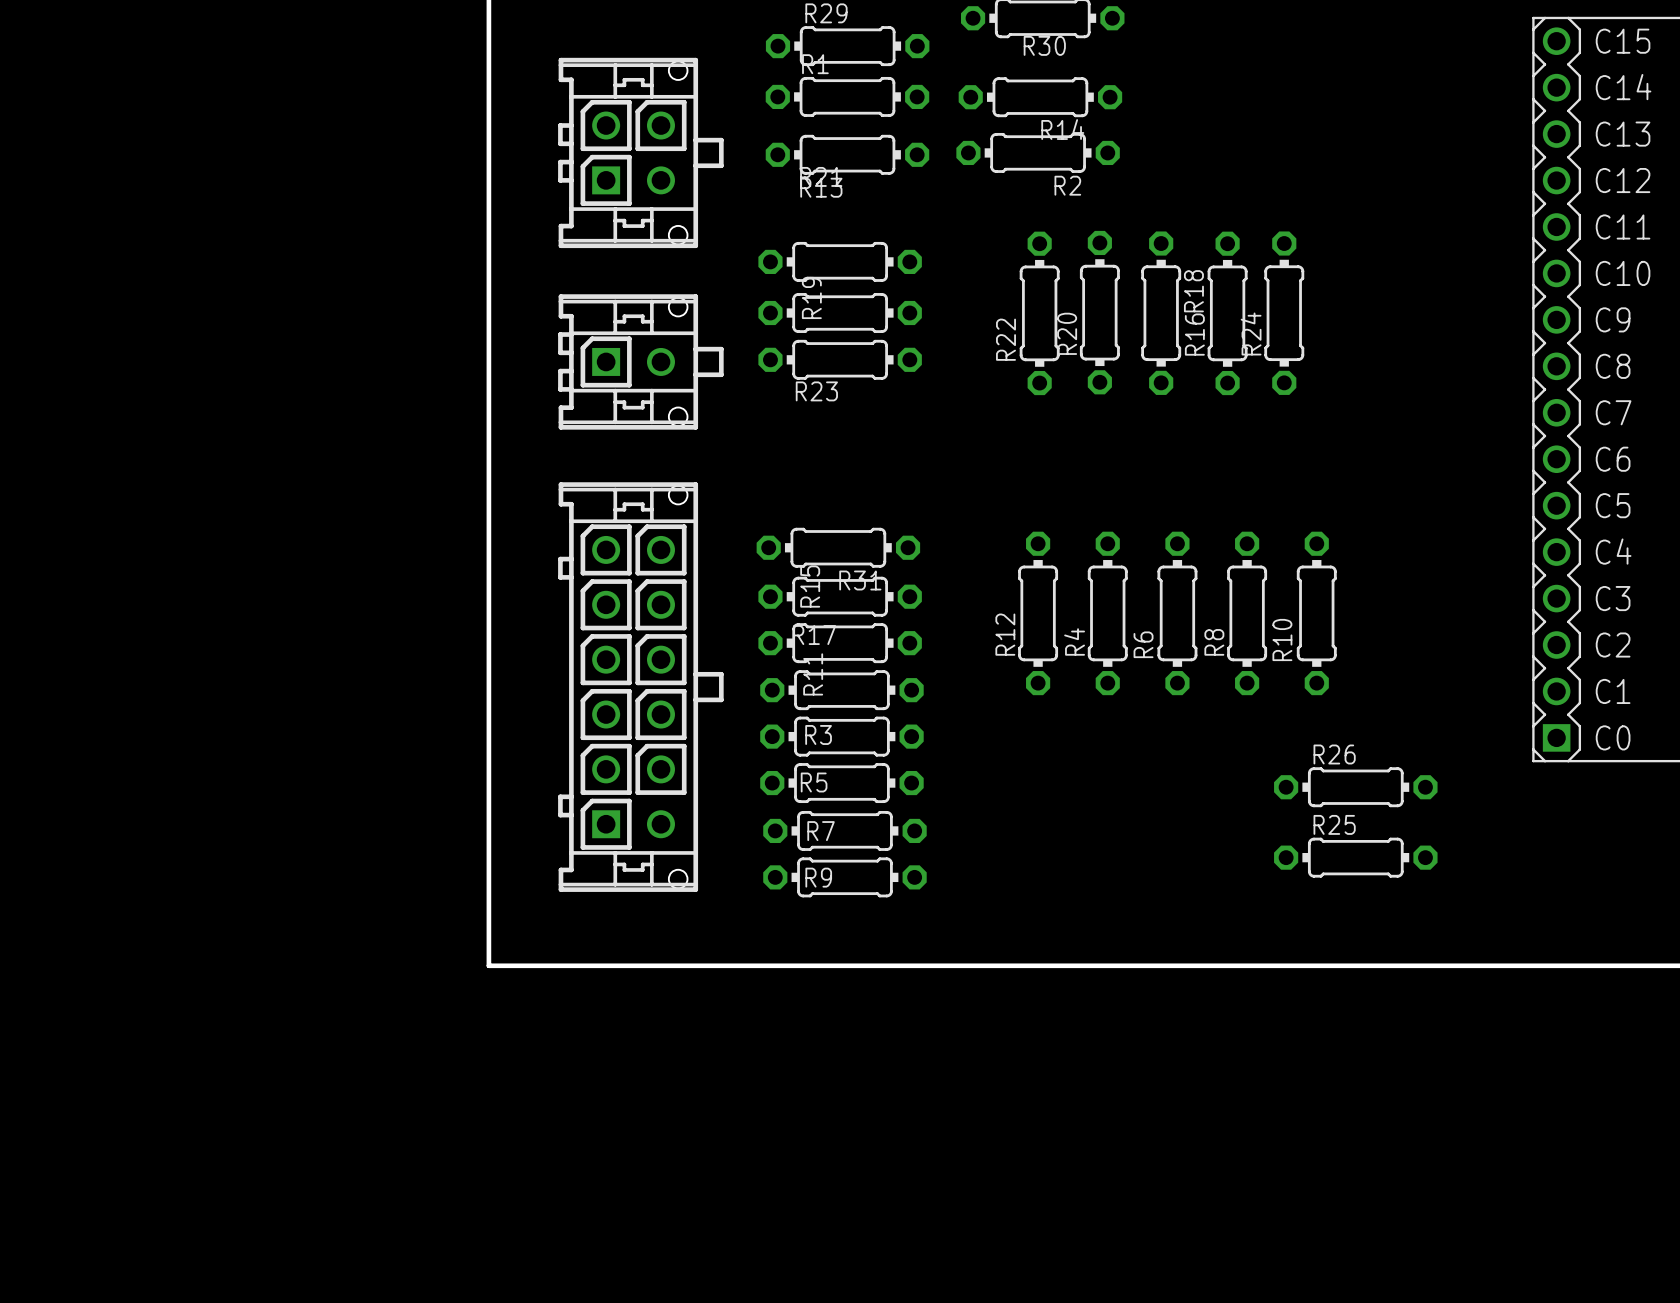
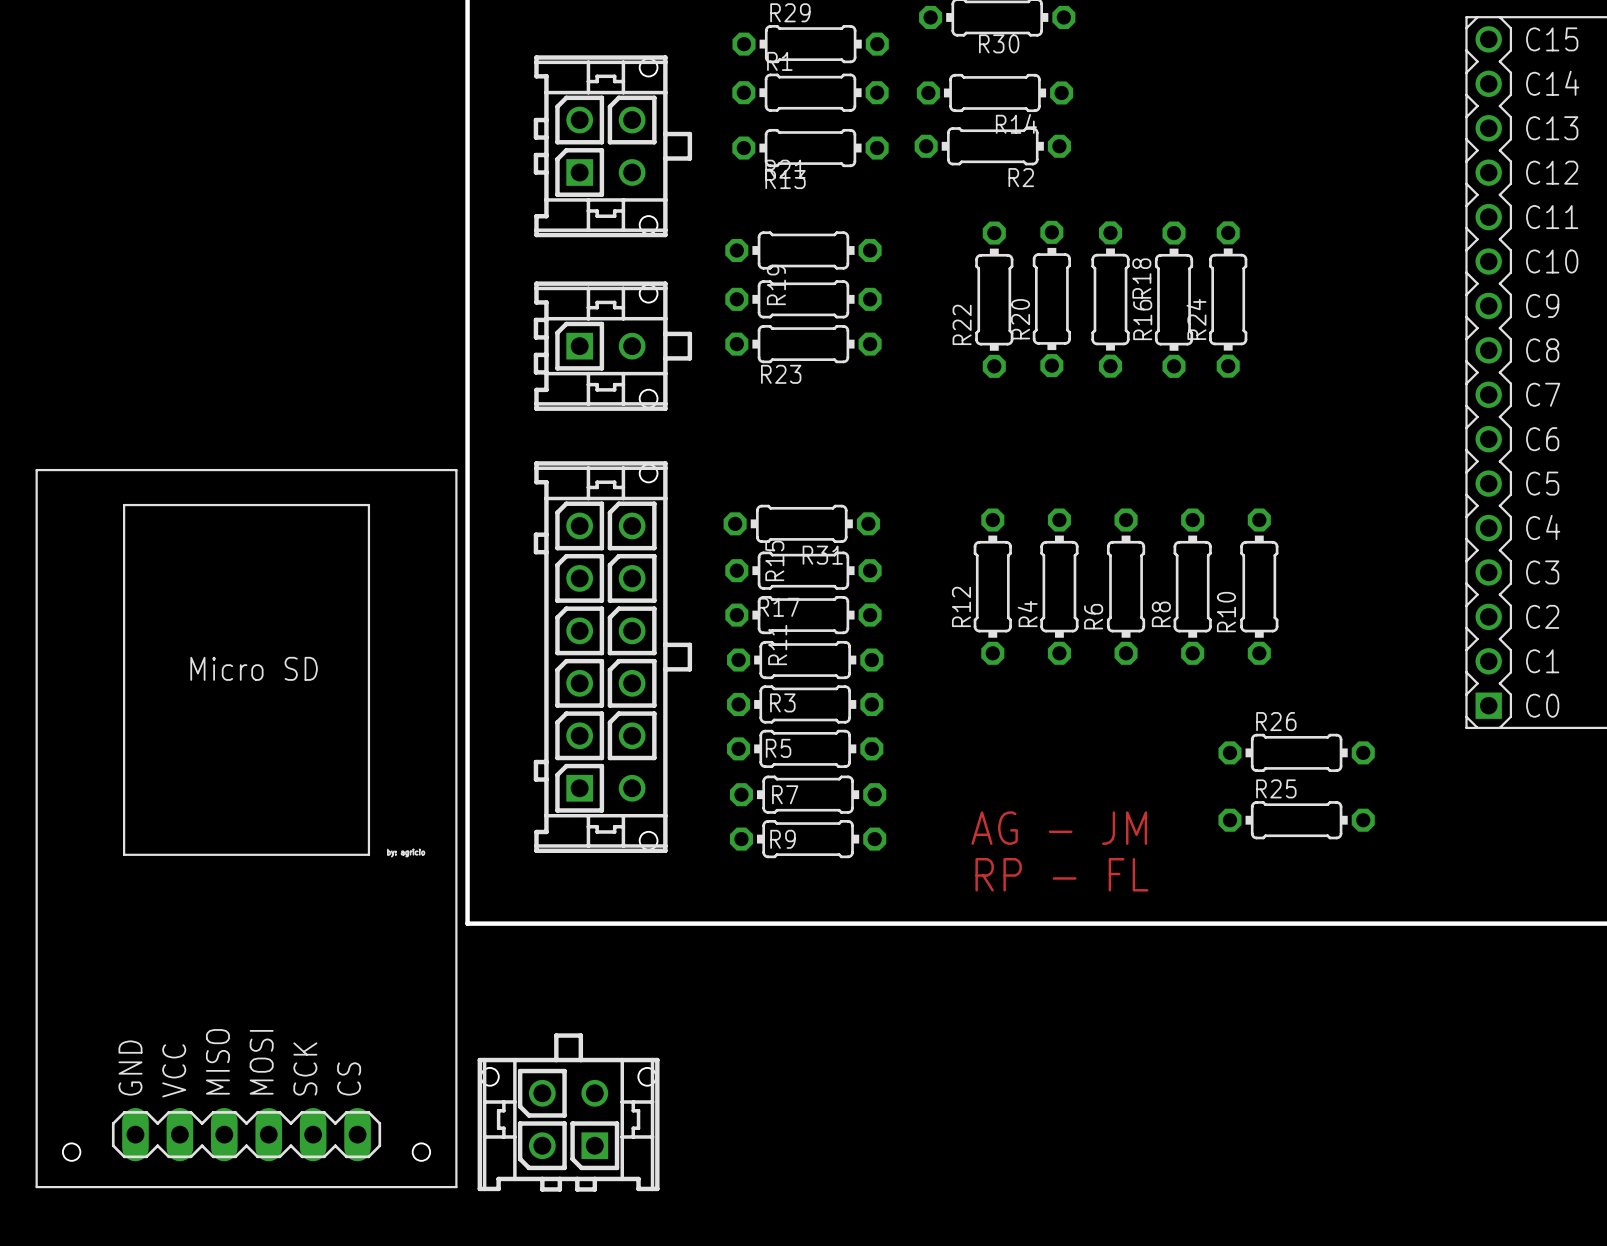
text: none -> AG - JM (1059, 828)
part: none -> (246, 828)
text: none -> RP - FL (1061, 874)
part: none -> (568, 1112)

